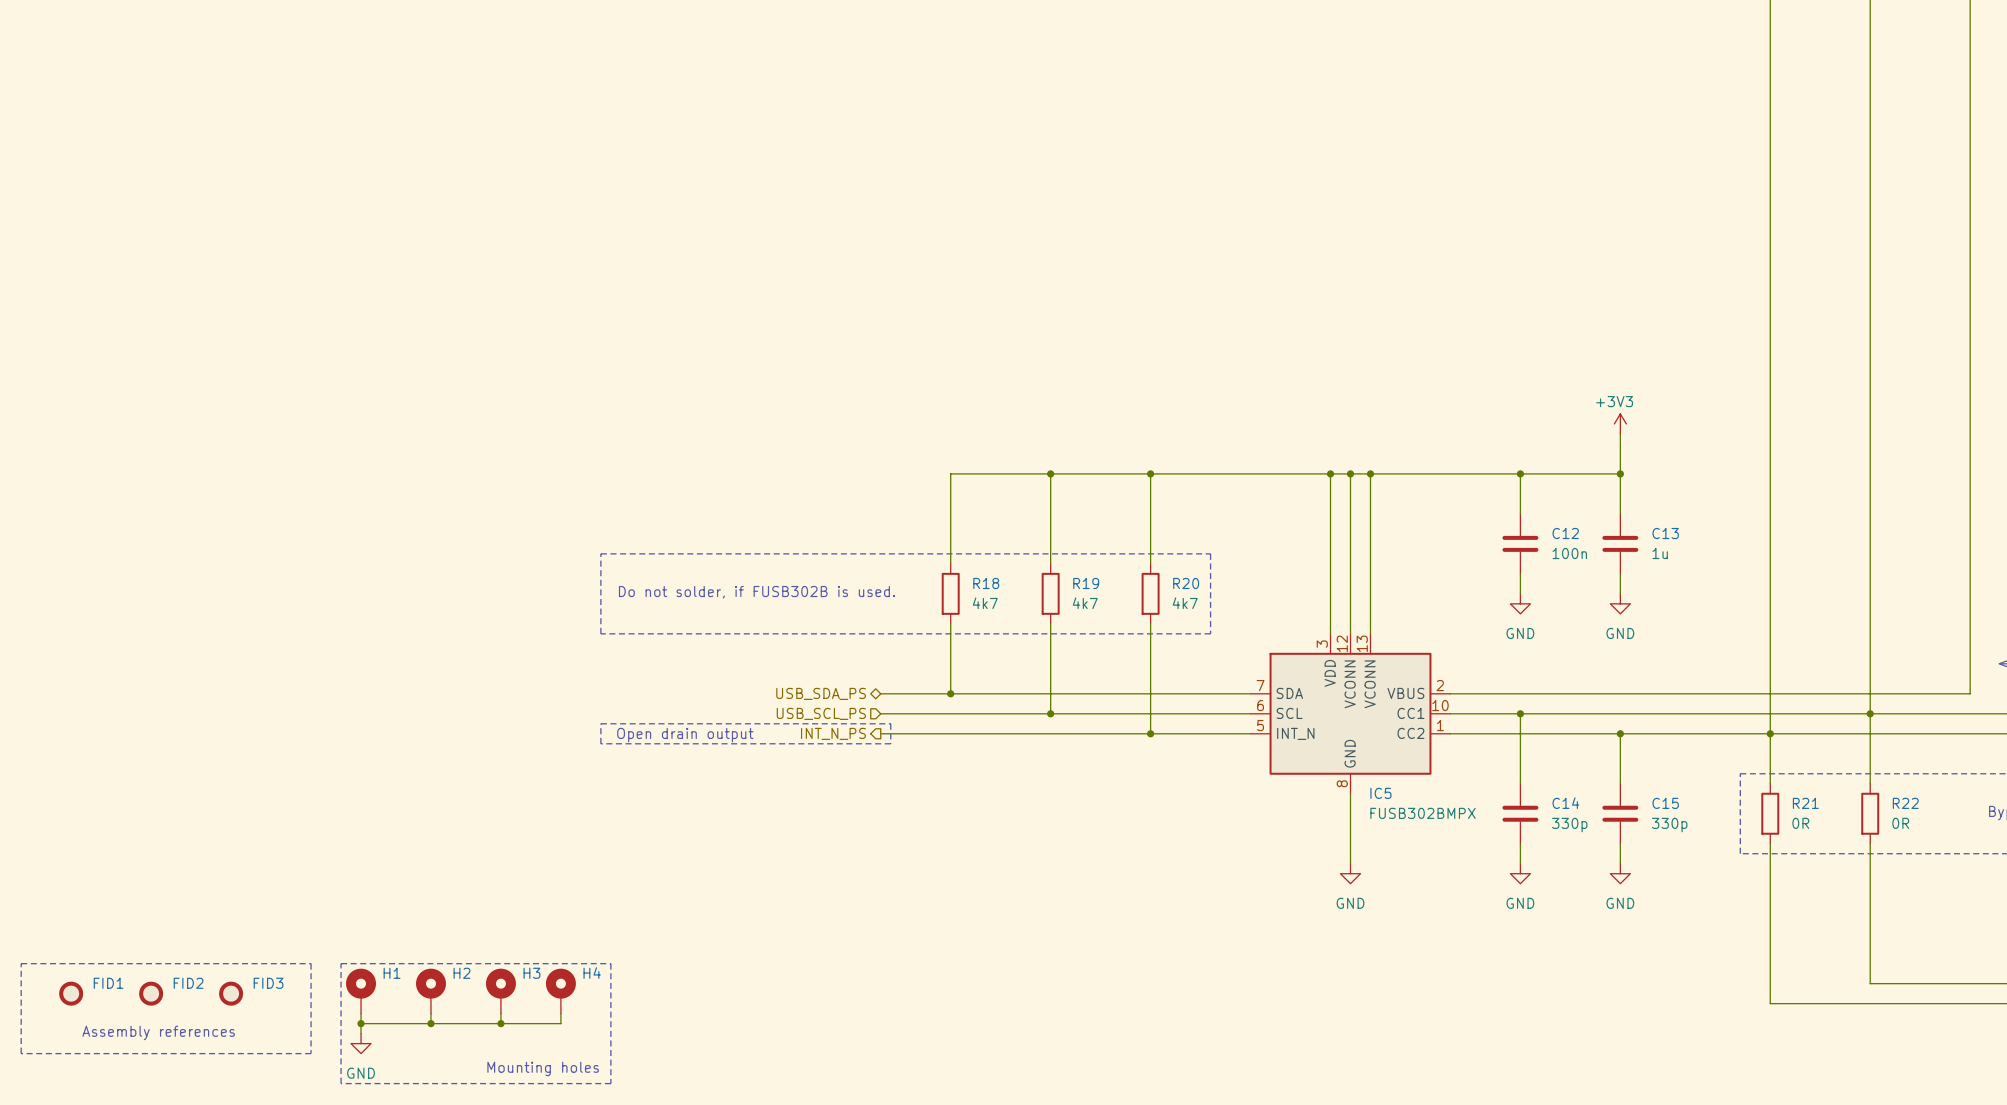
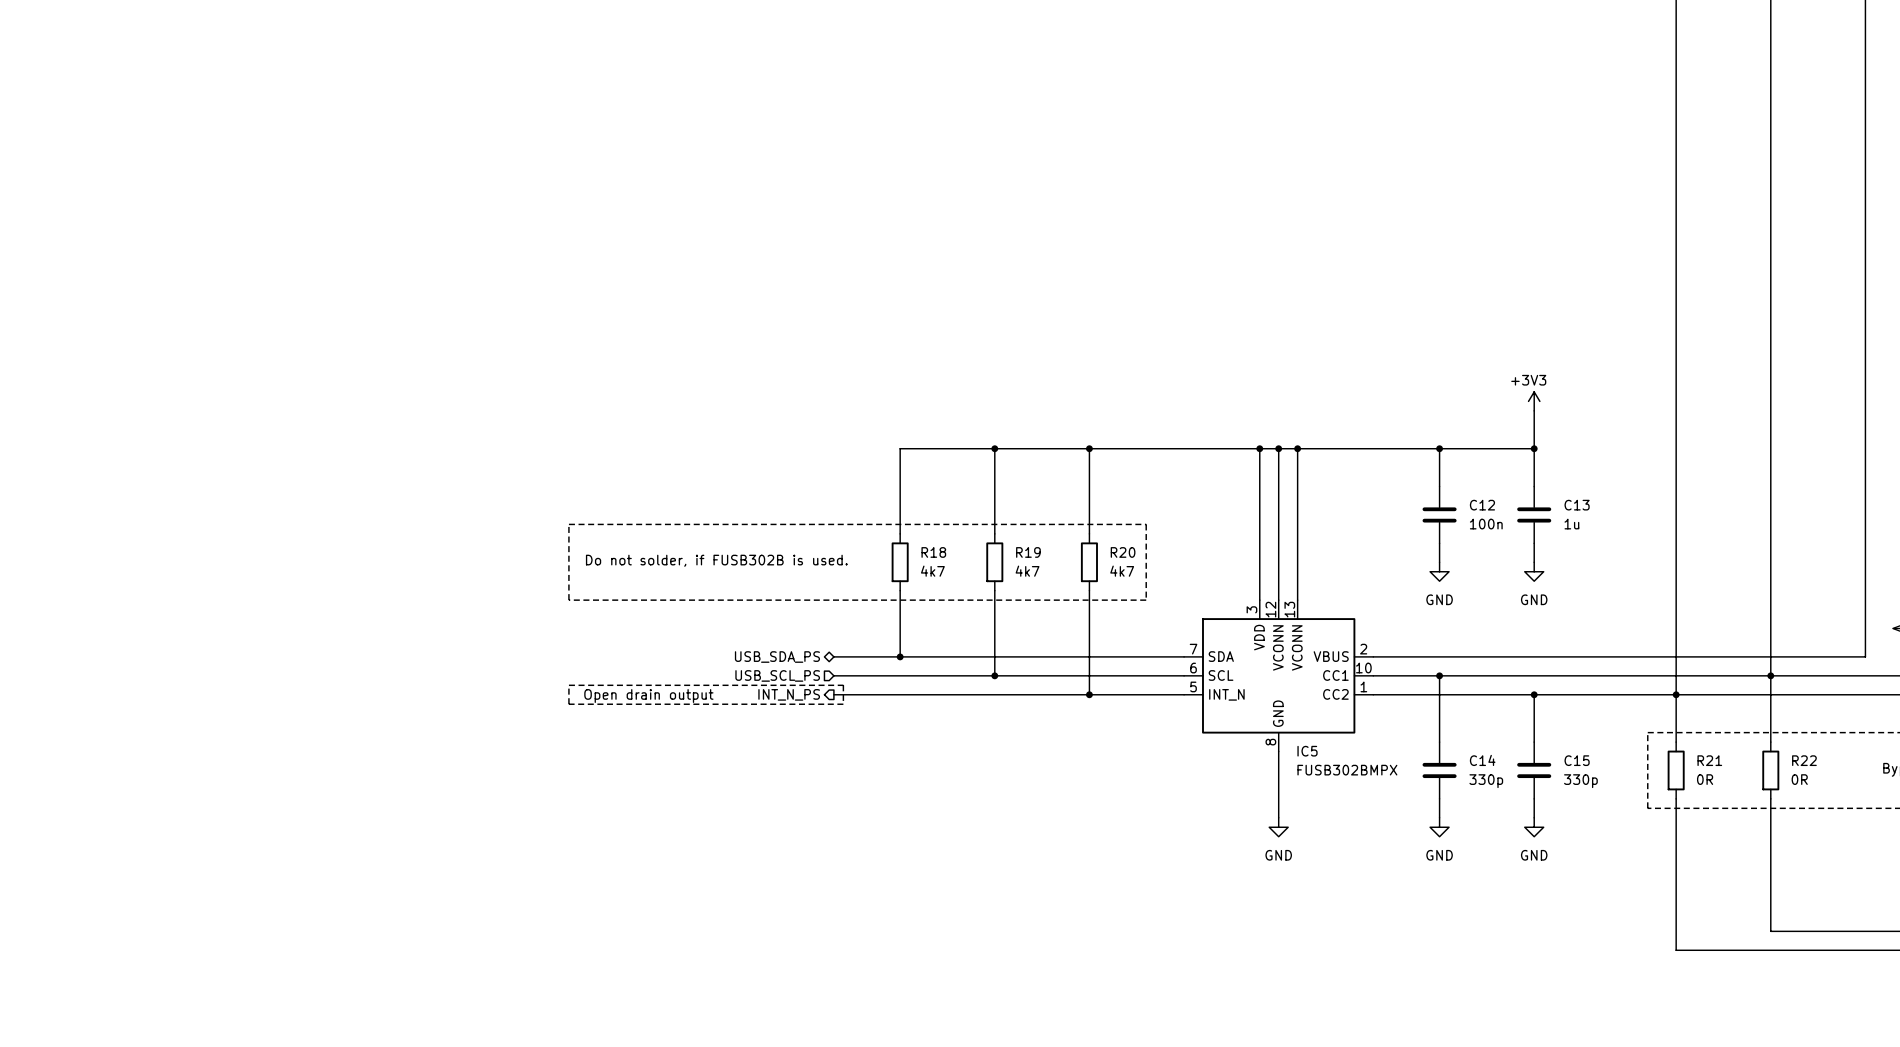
line: (21, 963) (311, 963) (311, 1053) (21, 1053) (21, 963) -> none
line: (341, 963) (610, 963) (610, 1083) (341, 1083) (341, 963) -> none
H1: (361, 991) -> none
H2: (430, 991) -> none
H3: (500, 991) -> none
H4: (560, 991) -> none
FID1: (71, 993) -> none
FID2: (151, 993) -> none
FID3: (231, 993) -> none
wire: (361, 1013) (361, 1033) -> none
wire: (430, 1013) (430, 1023) -> none
wire: (500, 1013) (500, 1023) -> none
wire: (560, 1013) (560, 1023) (361, 1023) -> none
junction: (361, 1023) -> none
junction: (430, 1023) -> none
junction: (500, 1023) -> none
text: Assembly references (158, 1032) -> none
power symbol: GND (361, 1043) -> none
text: Mounting holes (543, 1068) -> none

